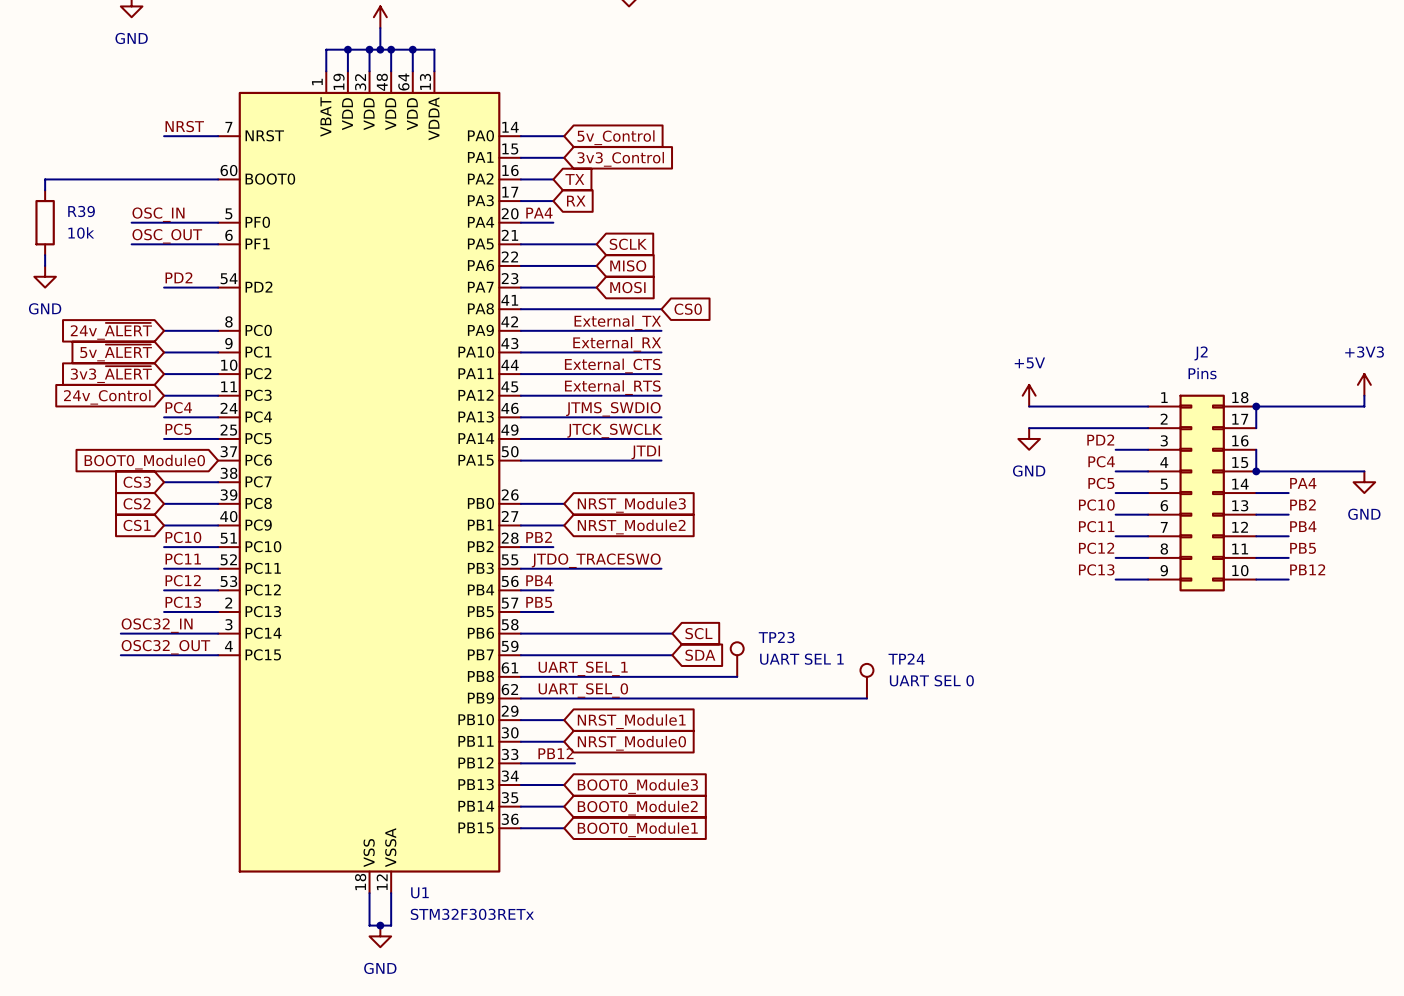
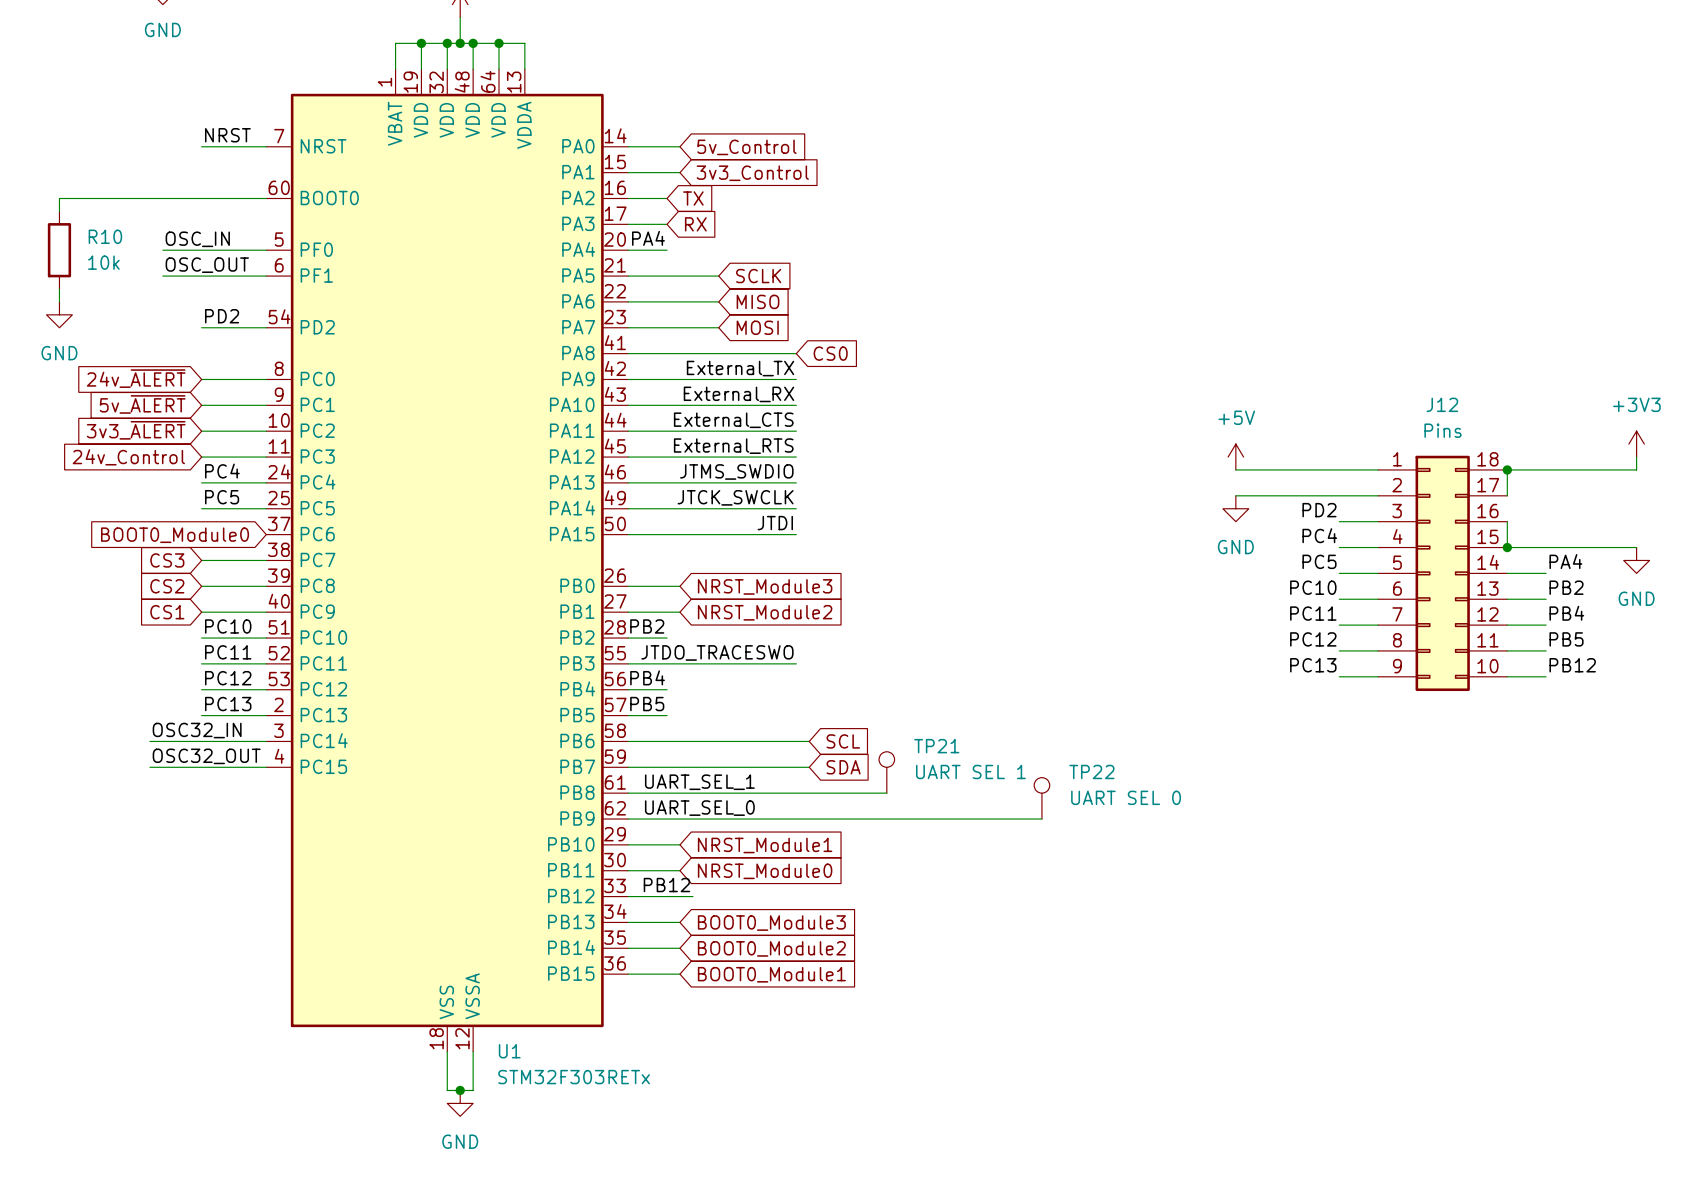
R39 name: R39 (81, 211) -> R10 (105, 236)
J2 name: J2 (1201, 353) -> J12 (1442, 404)
TP23 name: TP23 (776, 637) -> TP21 (936, 746)
TP24 name: TP24 (906, 659) -> TP22 (1091, 771)

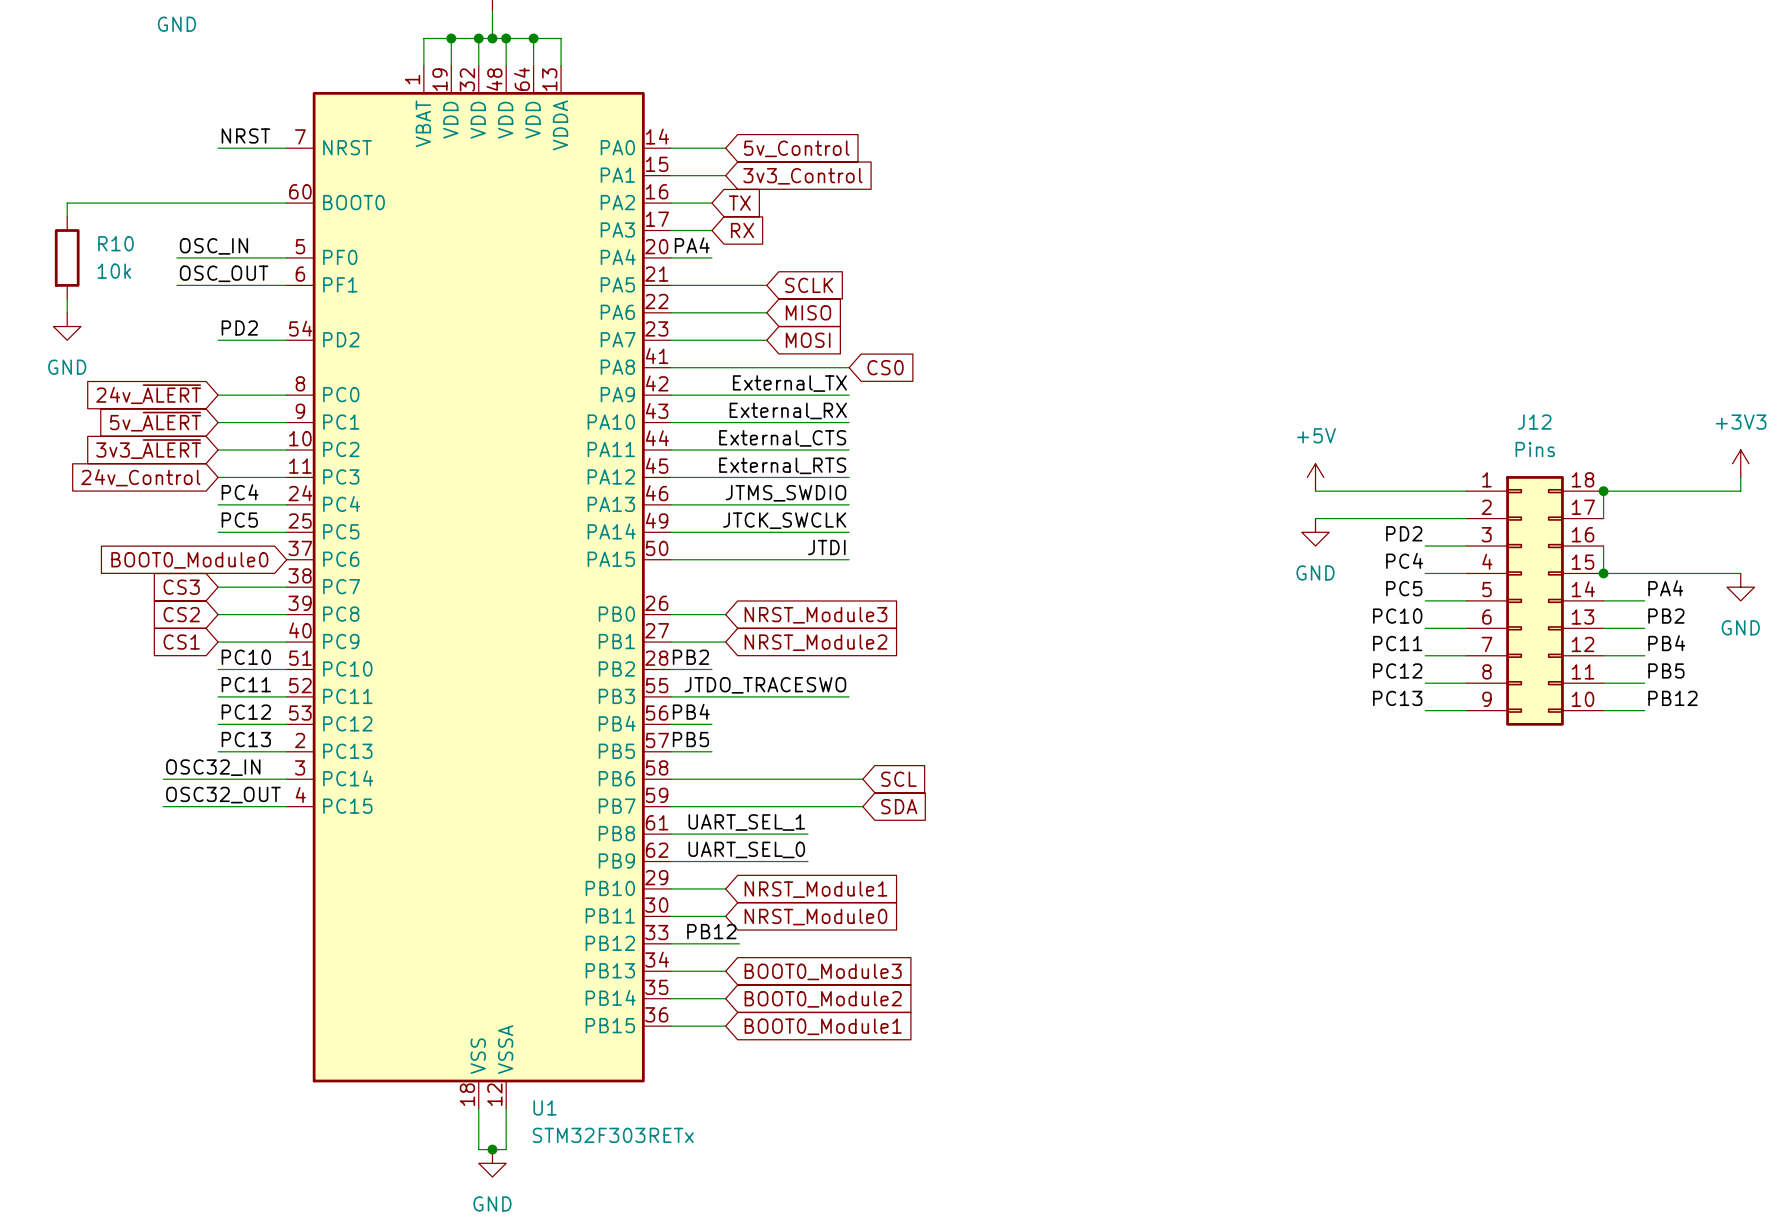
TP21: UART SEL 1 (886, 772) -> none
wire: (757, 793) (886, 793) -> none
TP22: UART SEL 0 (1041, 798) -> none
wire: (757, 819) (1041, 819) -> none

